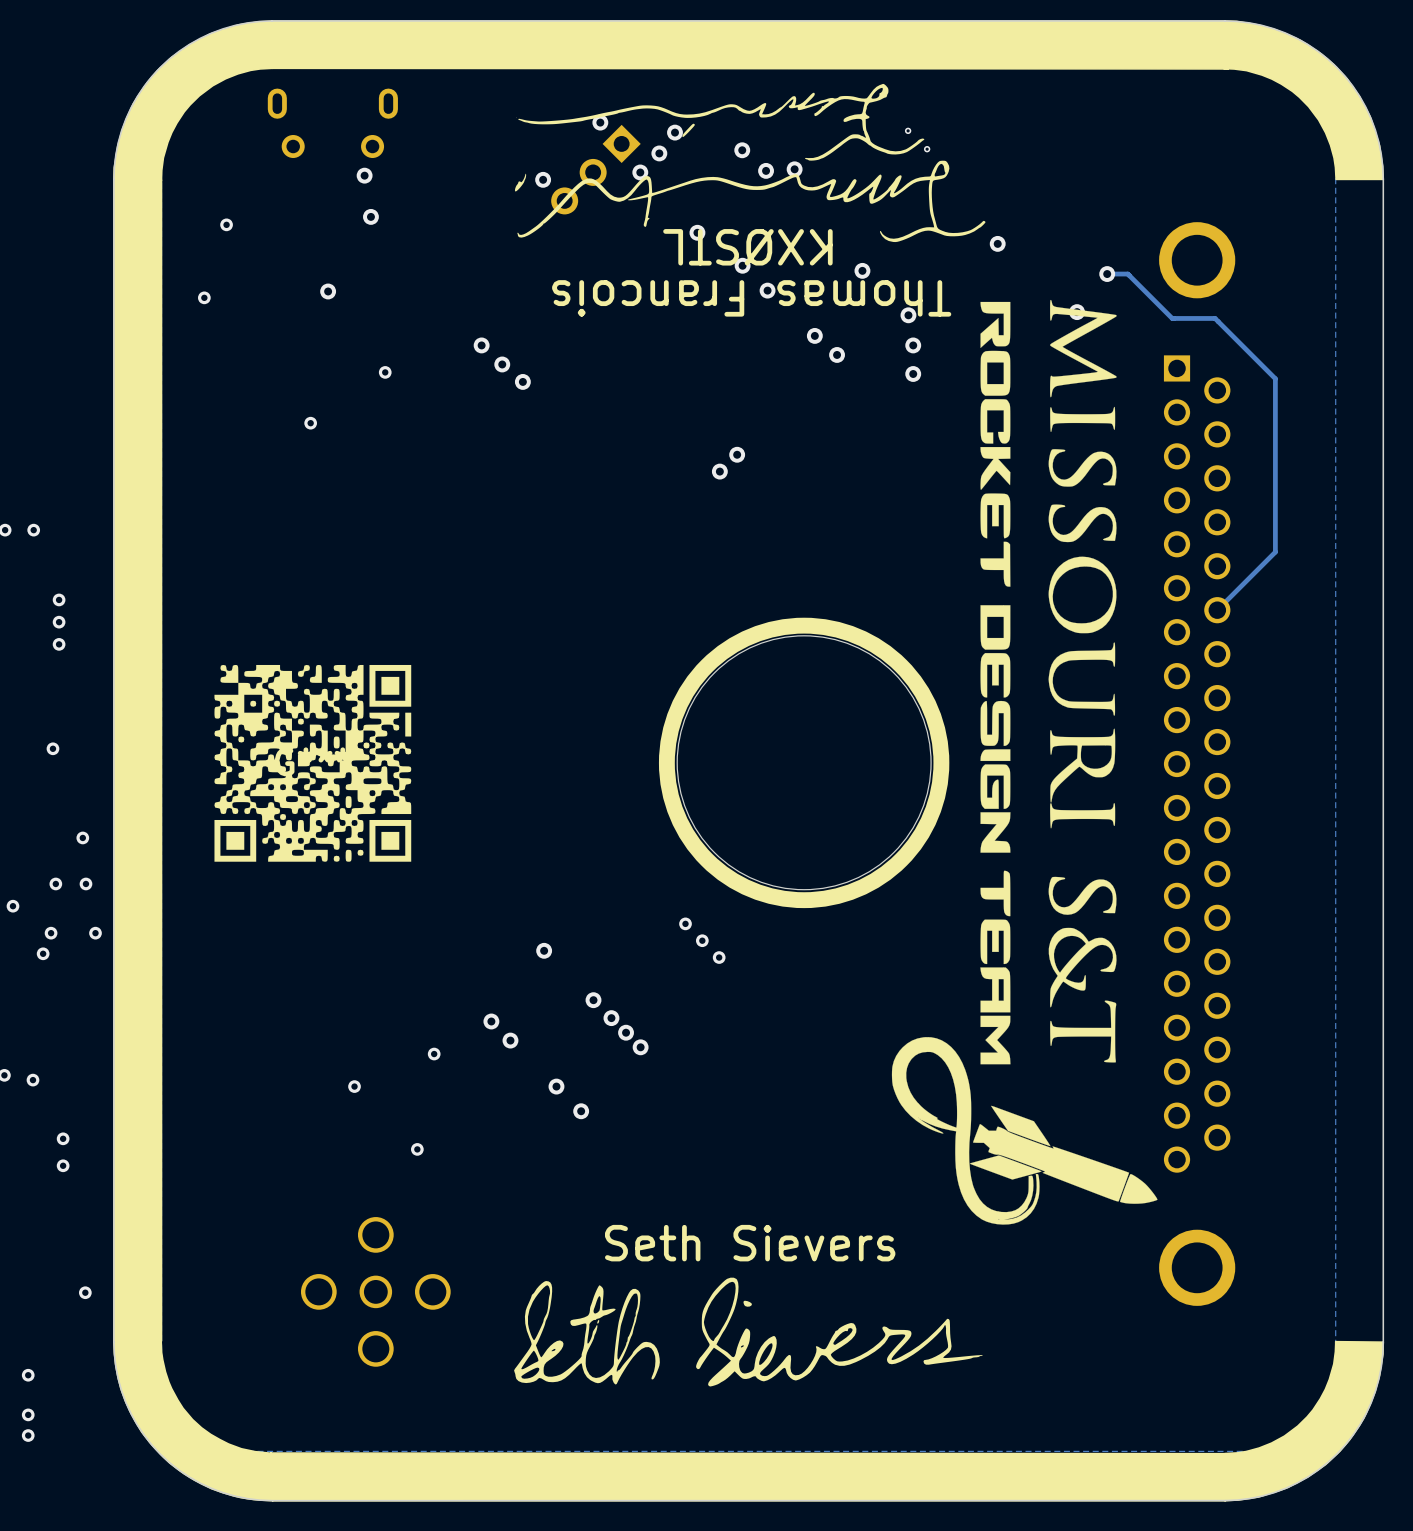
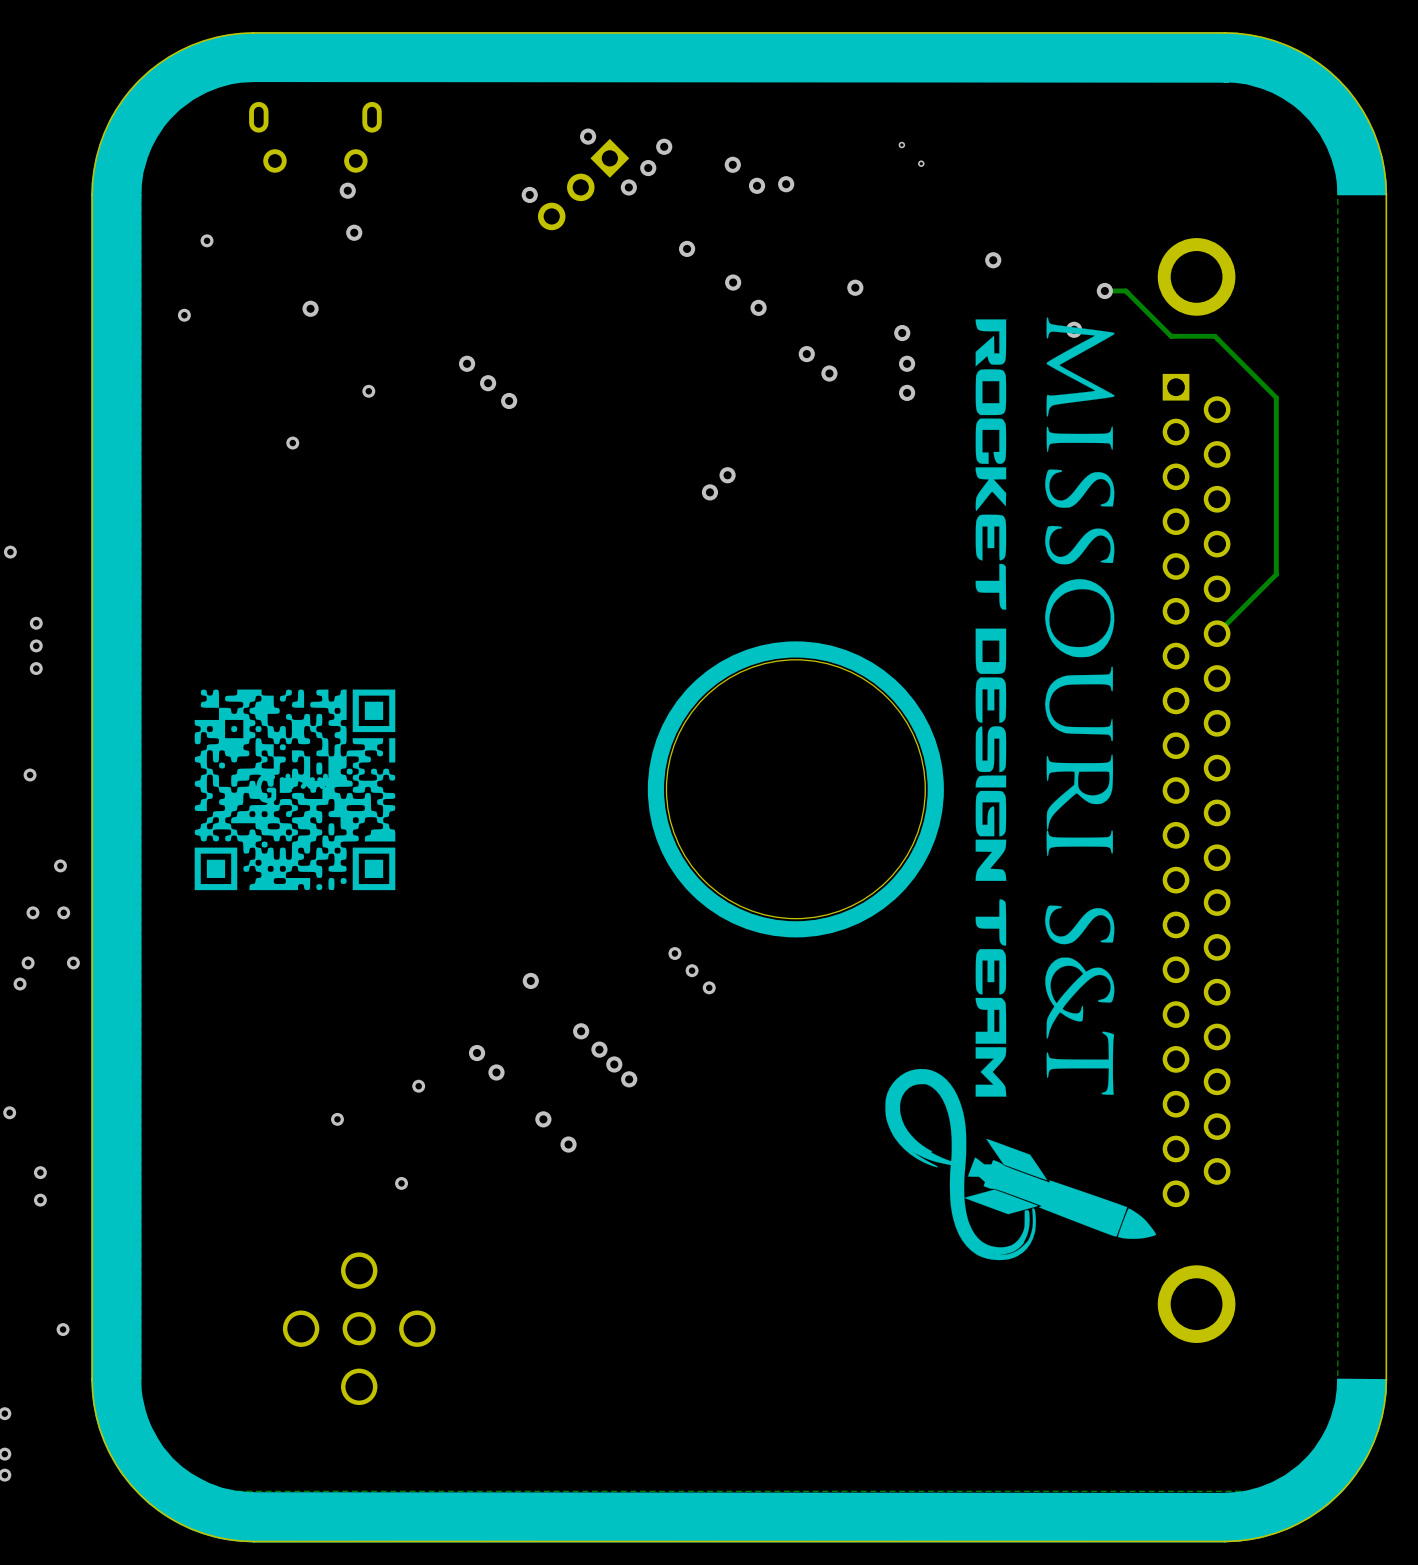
drawing: [514, 83, 986, 243] -> none
text: KXØSTL (747, 247) -> none
text: Thomas Francois (751, 298) -> none
text: Seth Sievers (750, 1243) -> none
drawing: [514, 1277, 983, 1387] -> none

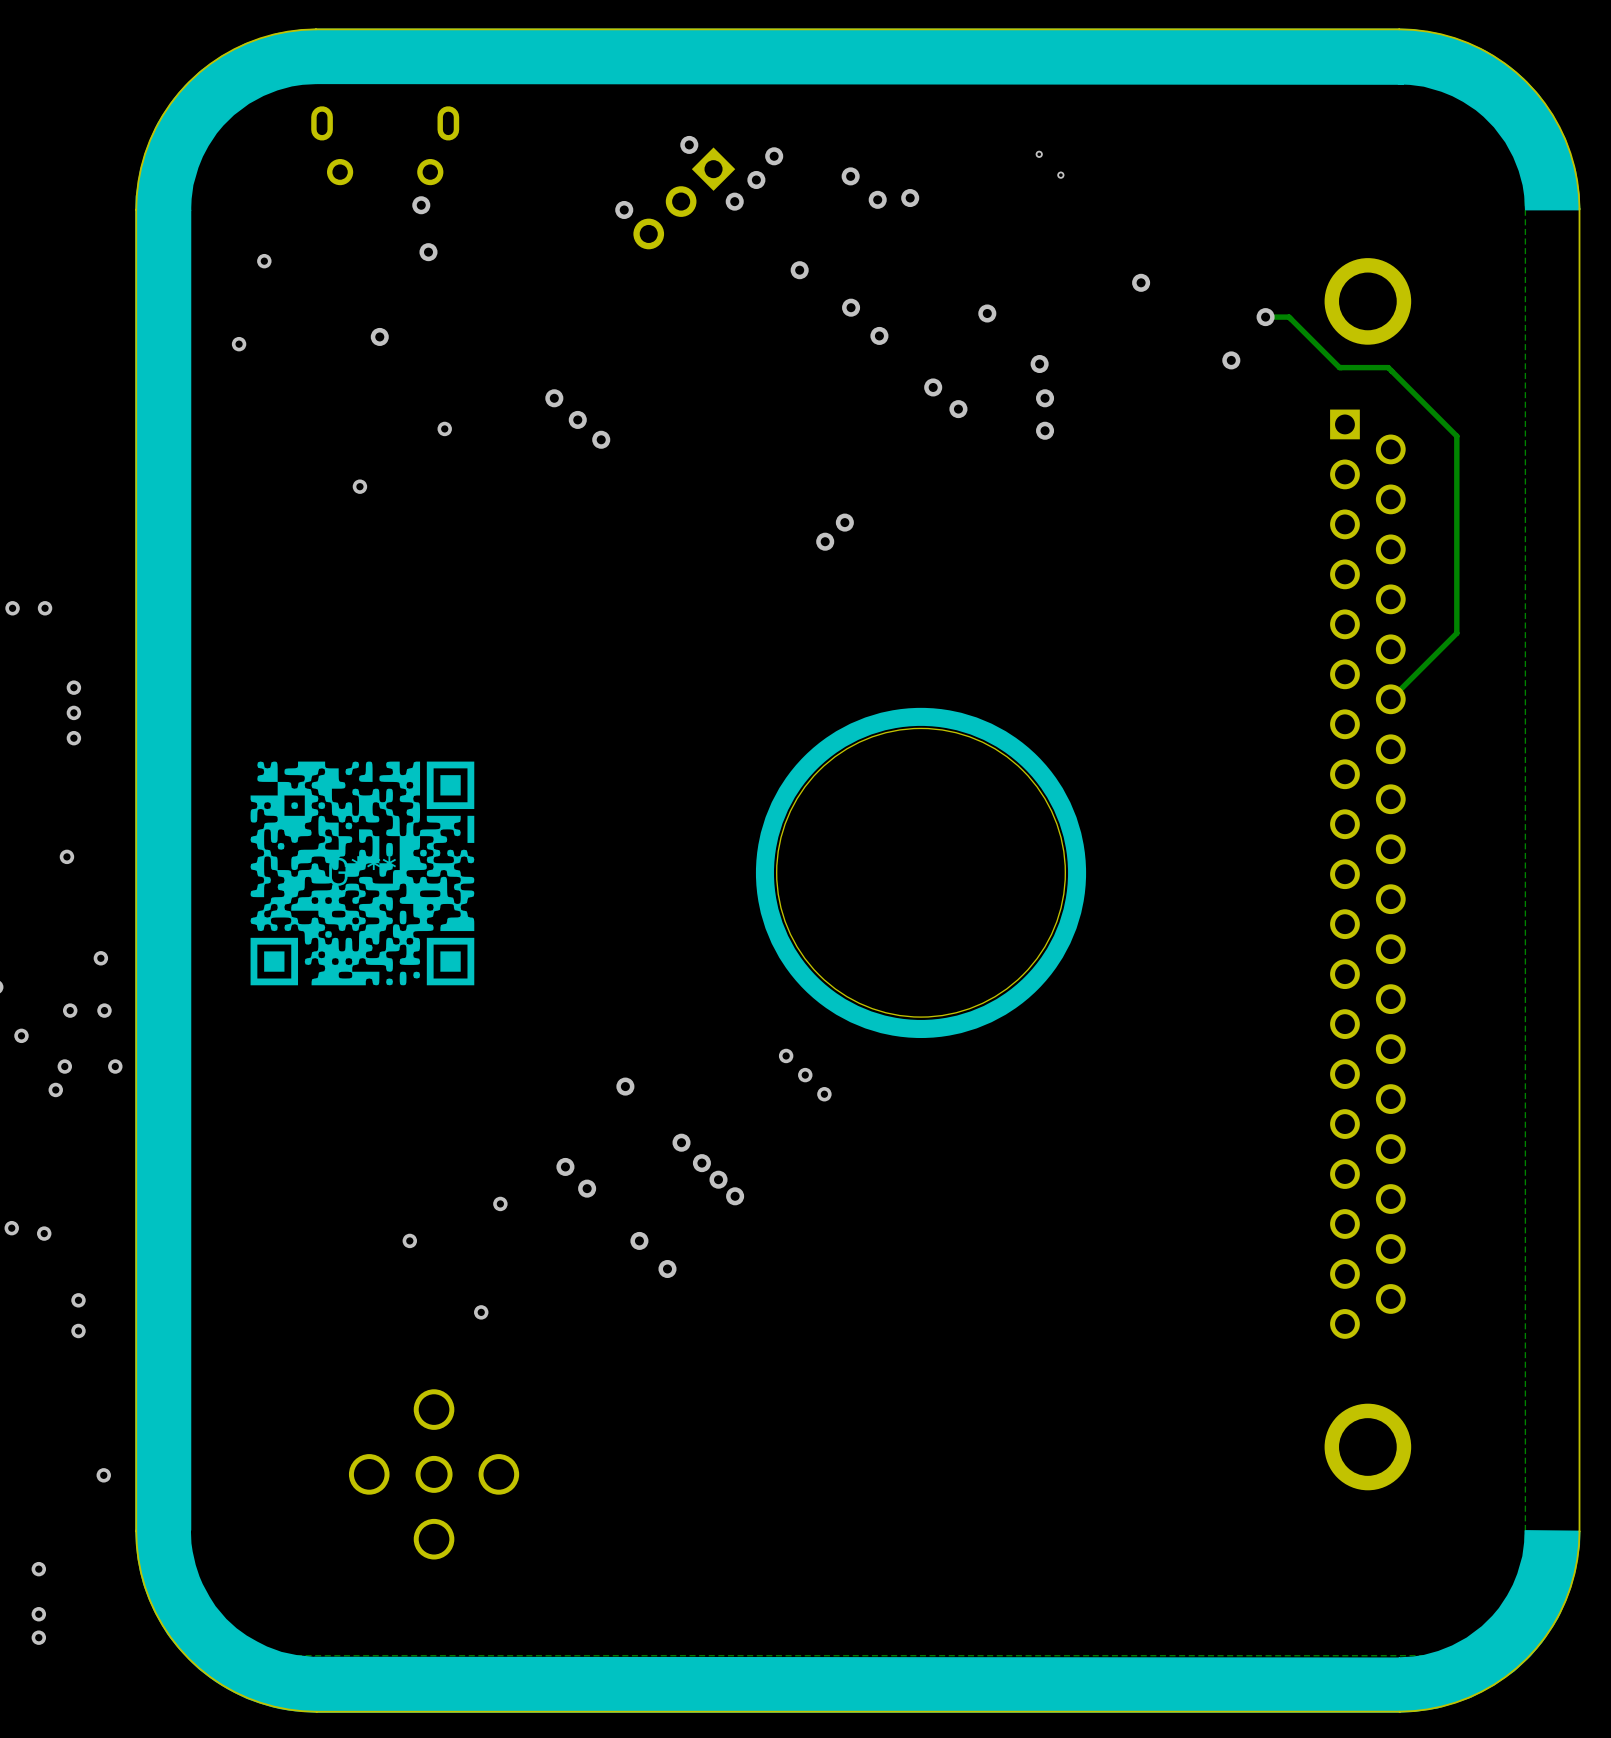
drawing: [885, 317, 1157, 1261] -> none

